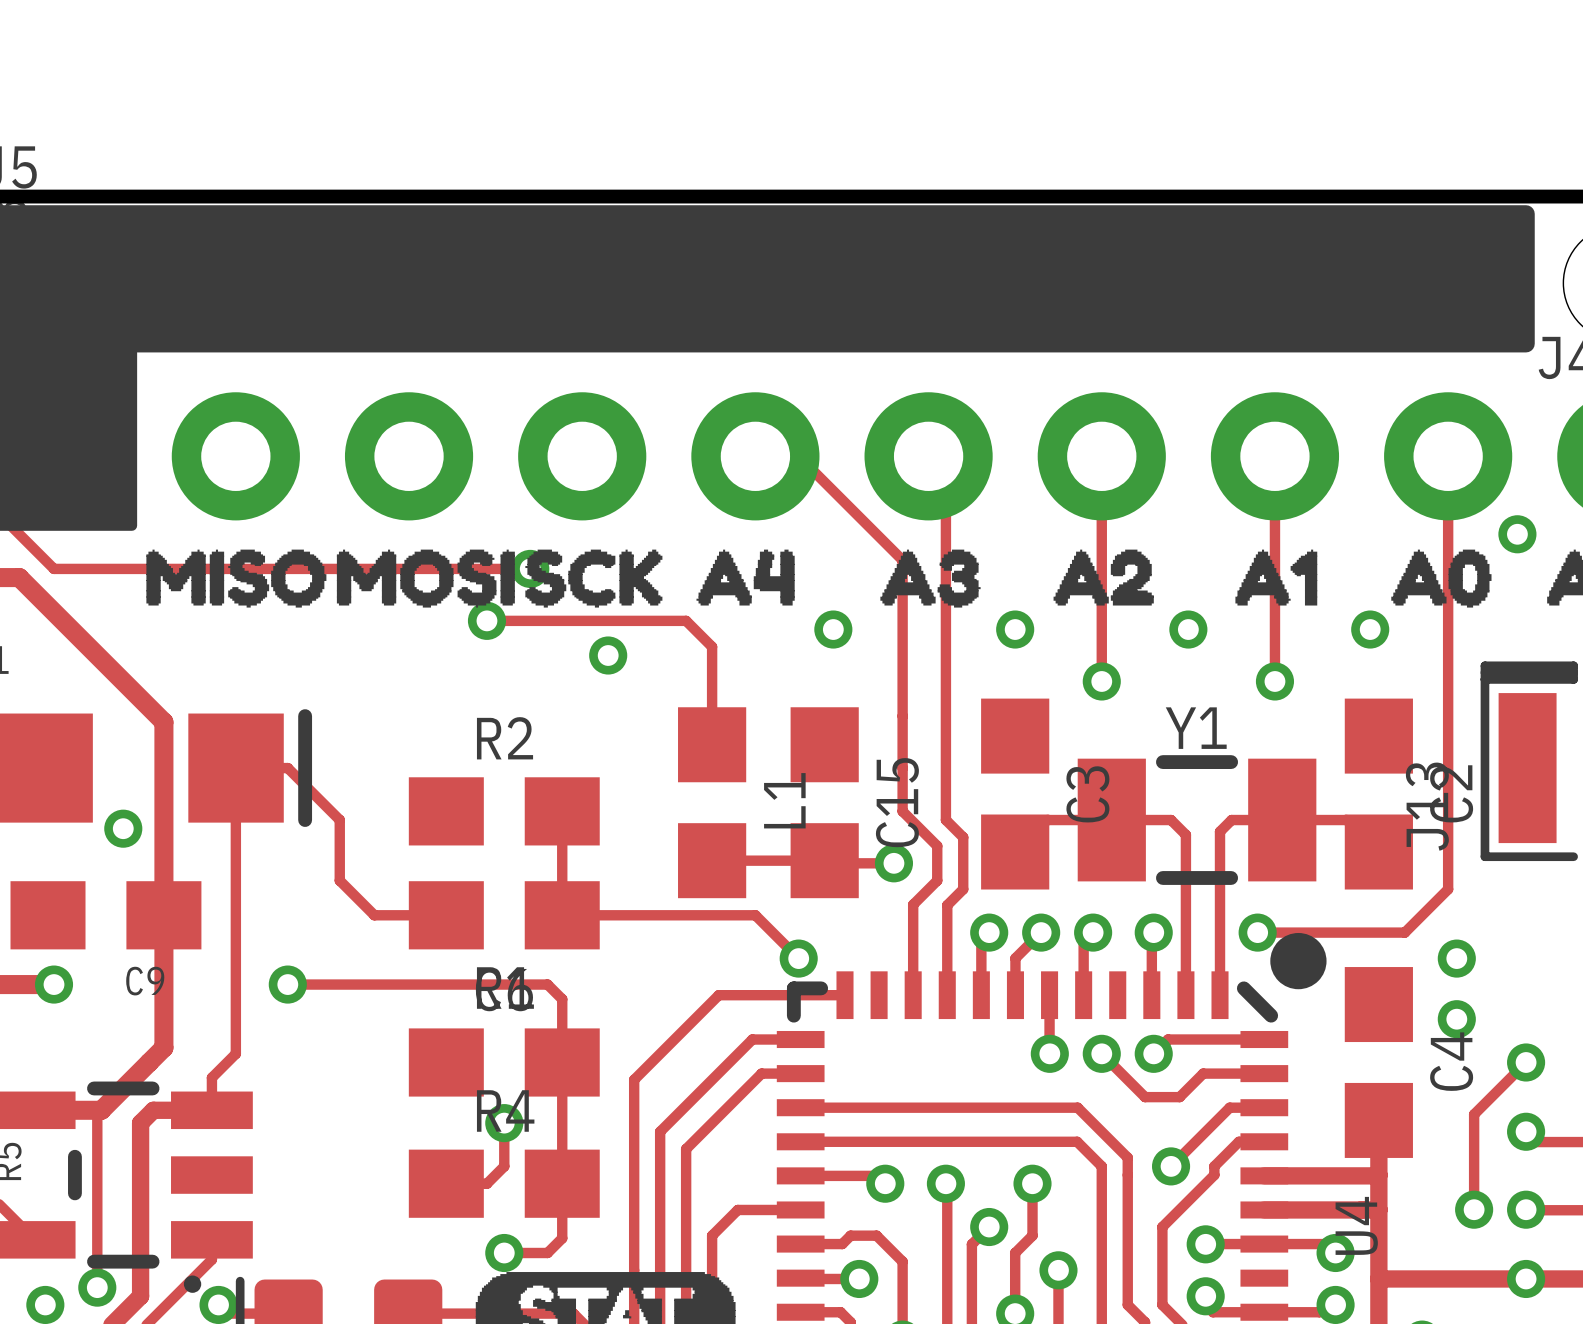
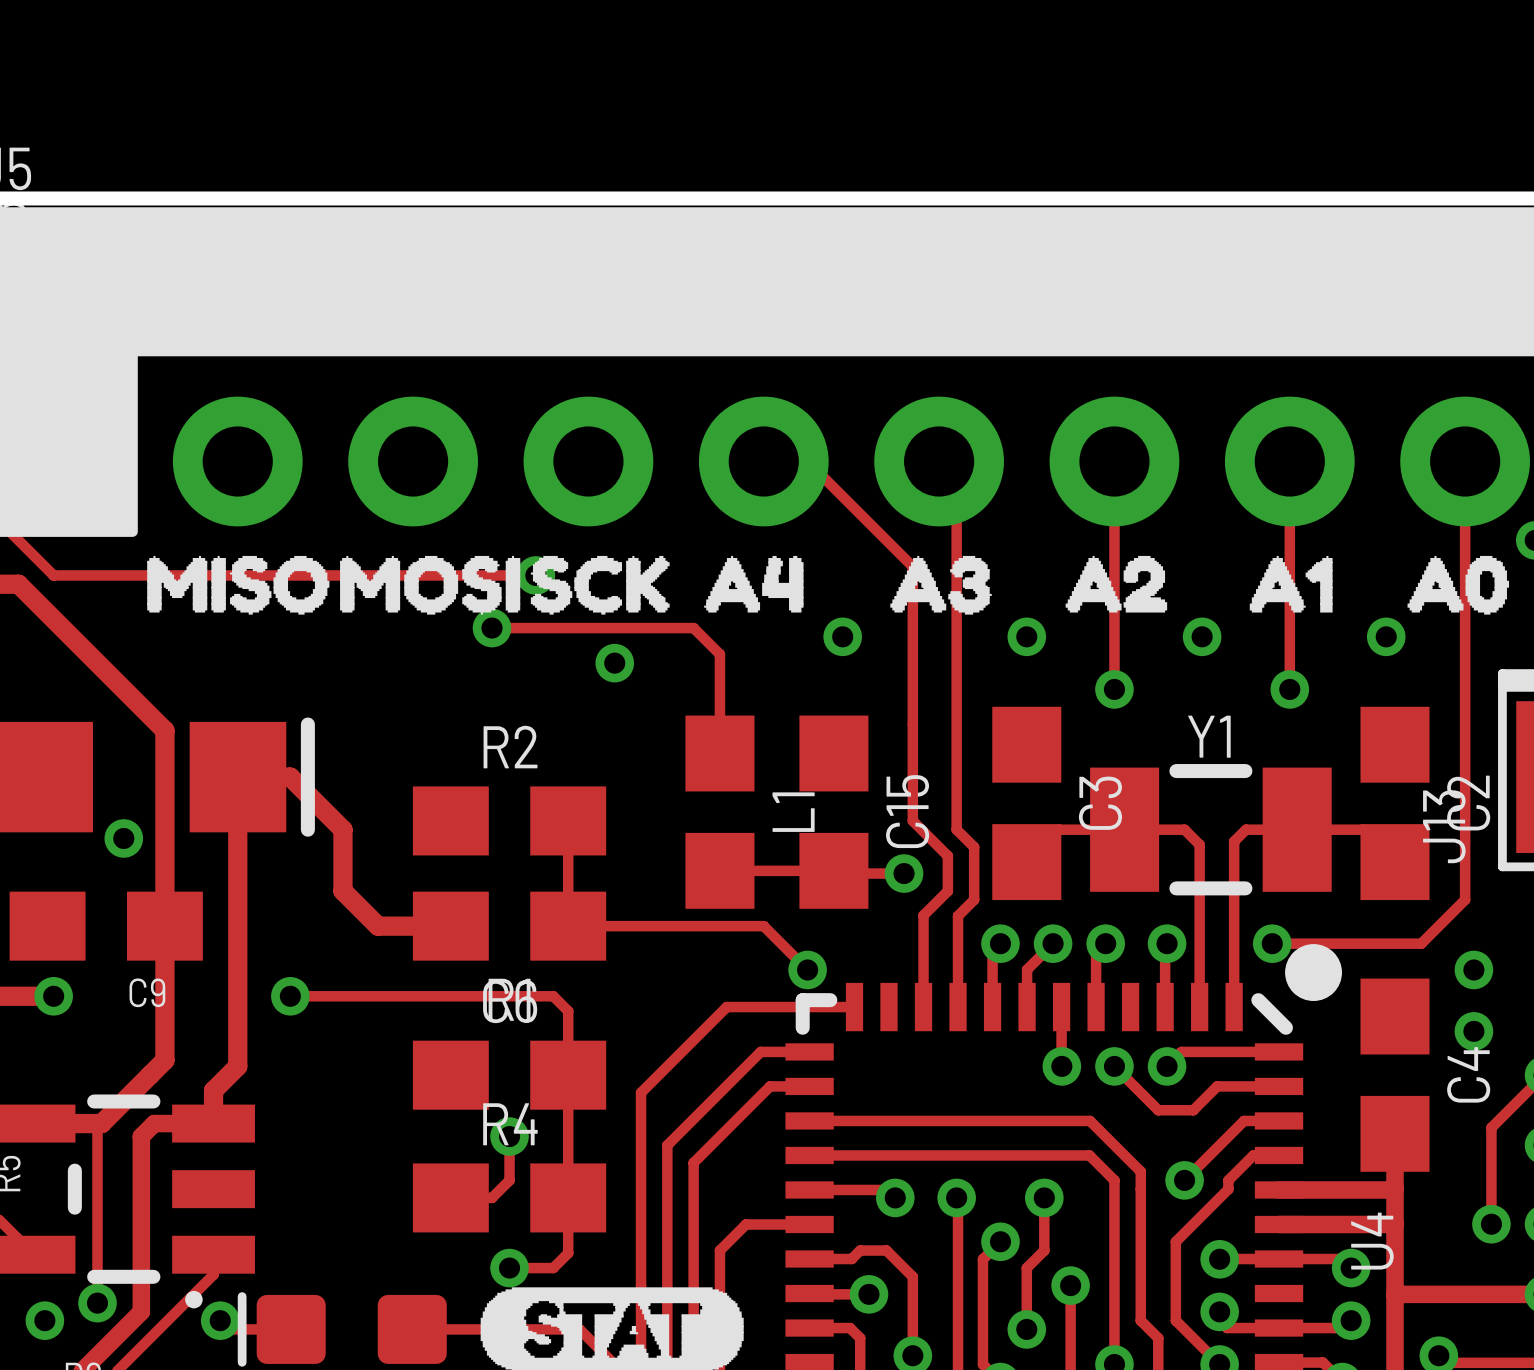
track width: thin (235, 768) (235, 1053) (211, 1077) (211, 1110) -> thick (237, 777) (237, 1066) (213, 1090) (213, 1123)
track width: thin (236, 768) (287, 768) (339, 820) (339, 880) (374, 915) (446, 915) -> thick (237, 777) (290, 777) (342, 829) (342, 891) (378, 926) (450, 926)

